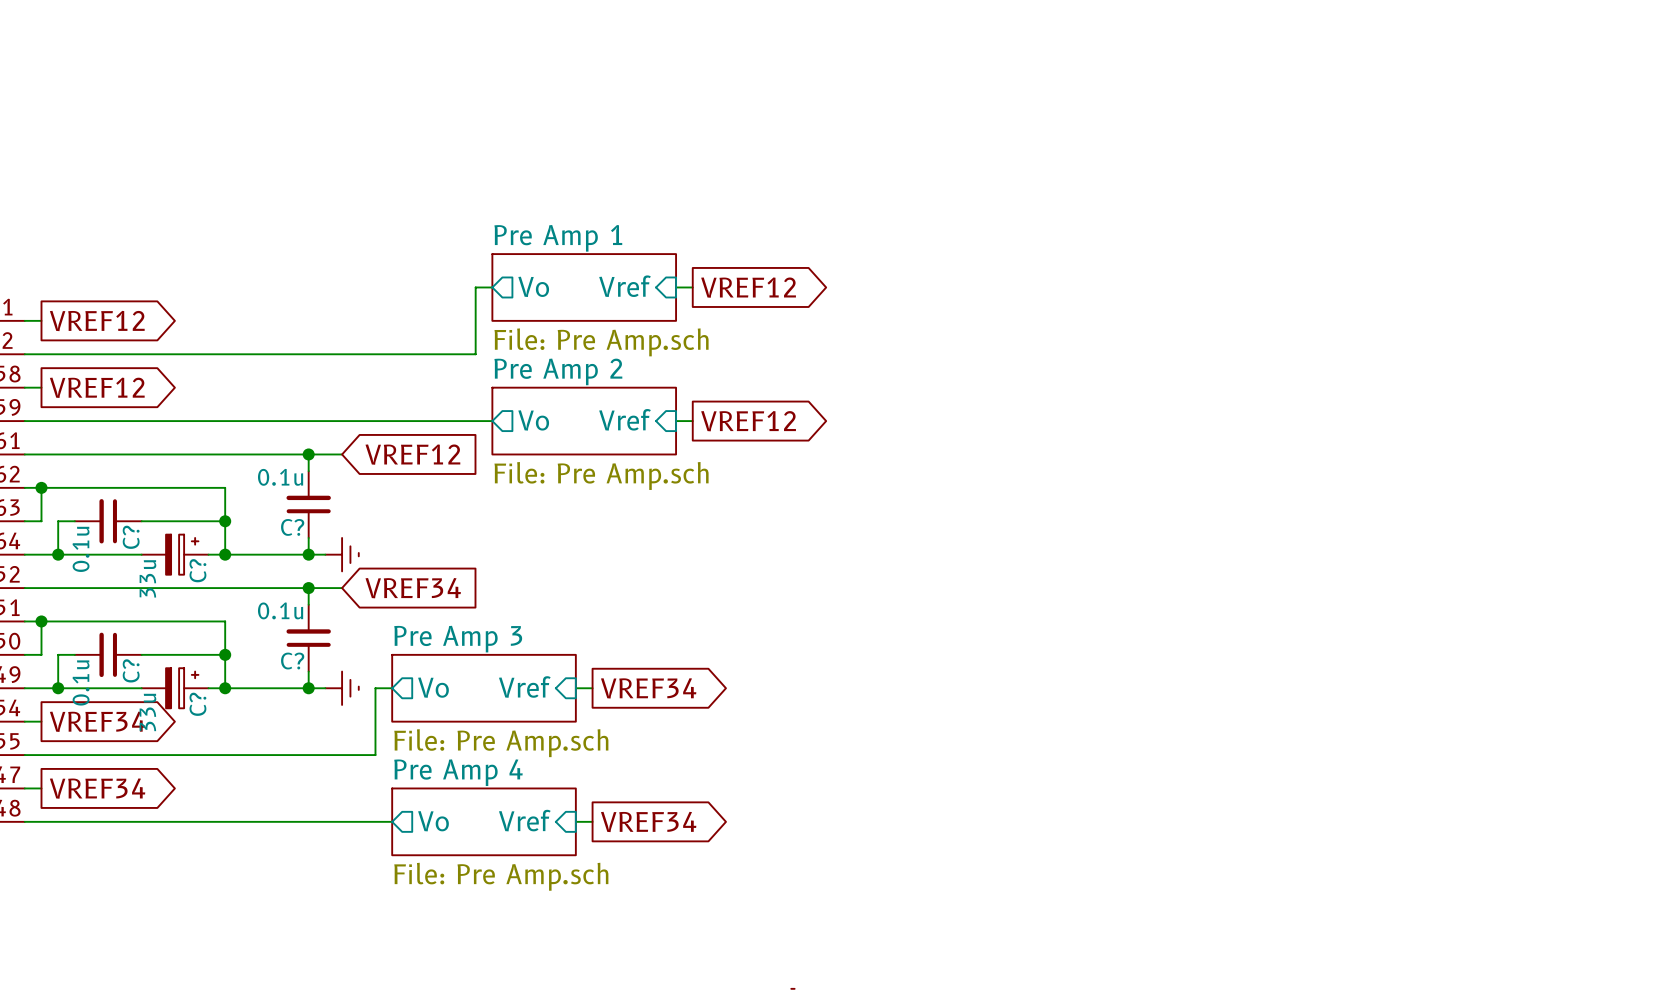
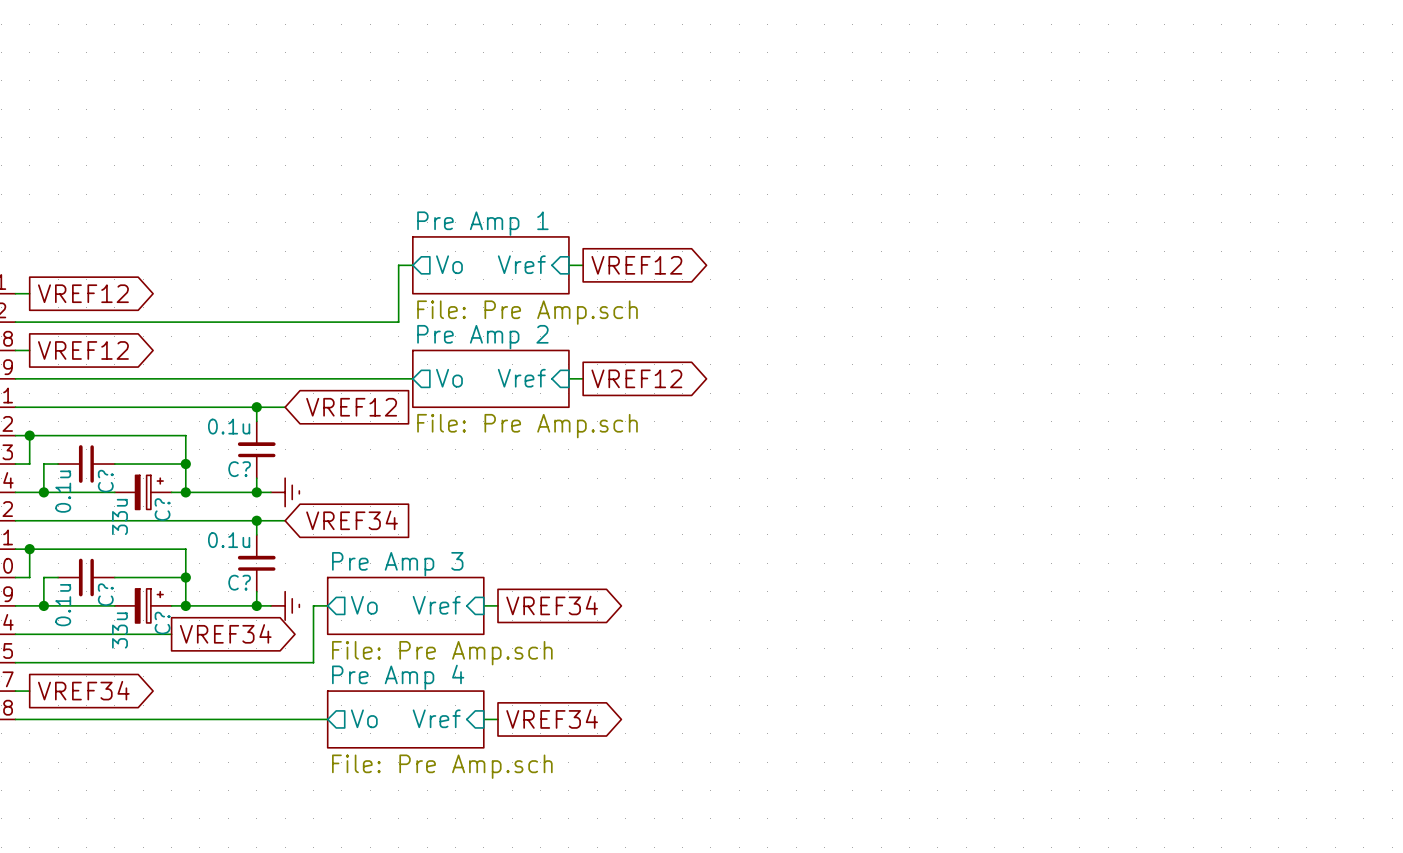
wire: none -> (29, 634) (171, 634)
global label position: VREF34 (97, 721) -> VREF34 (225, 633)

